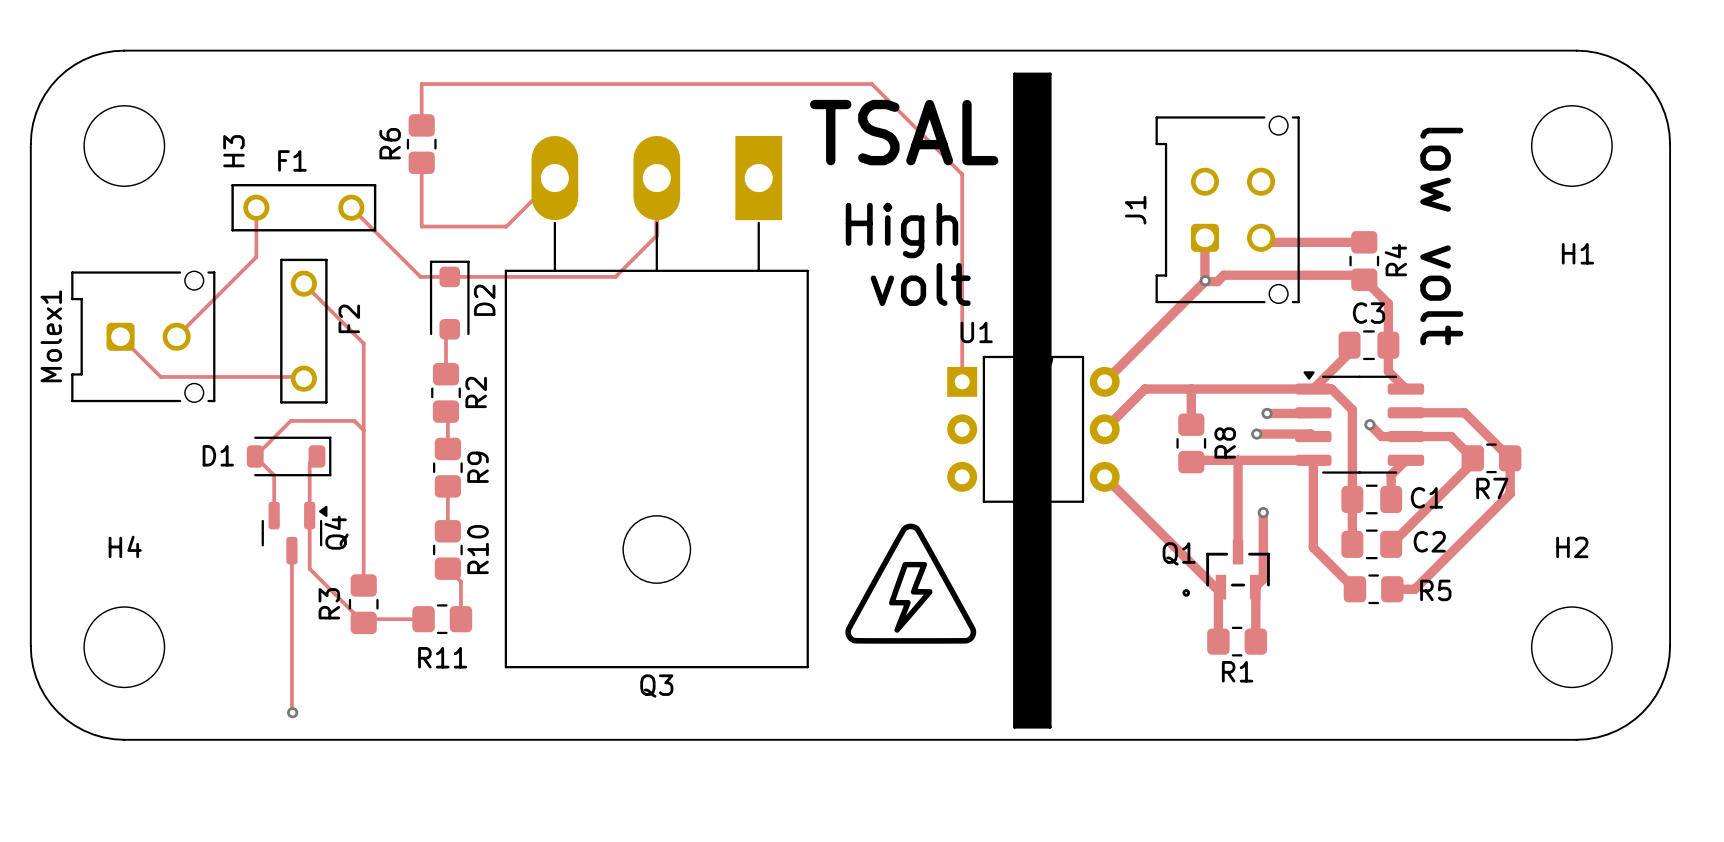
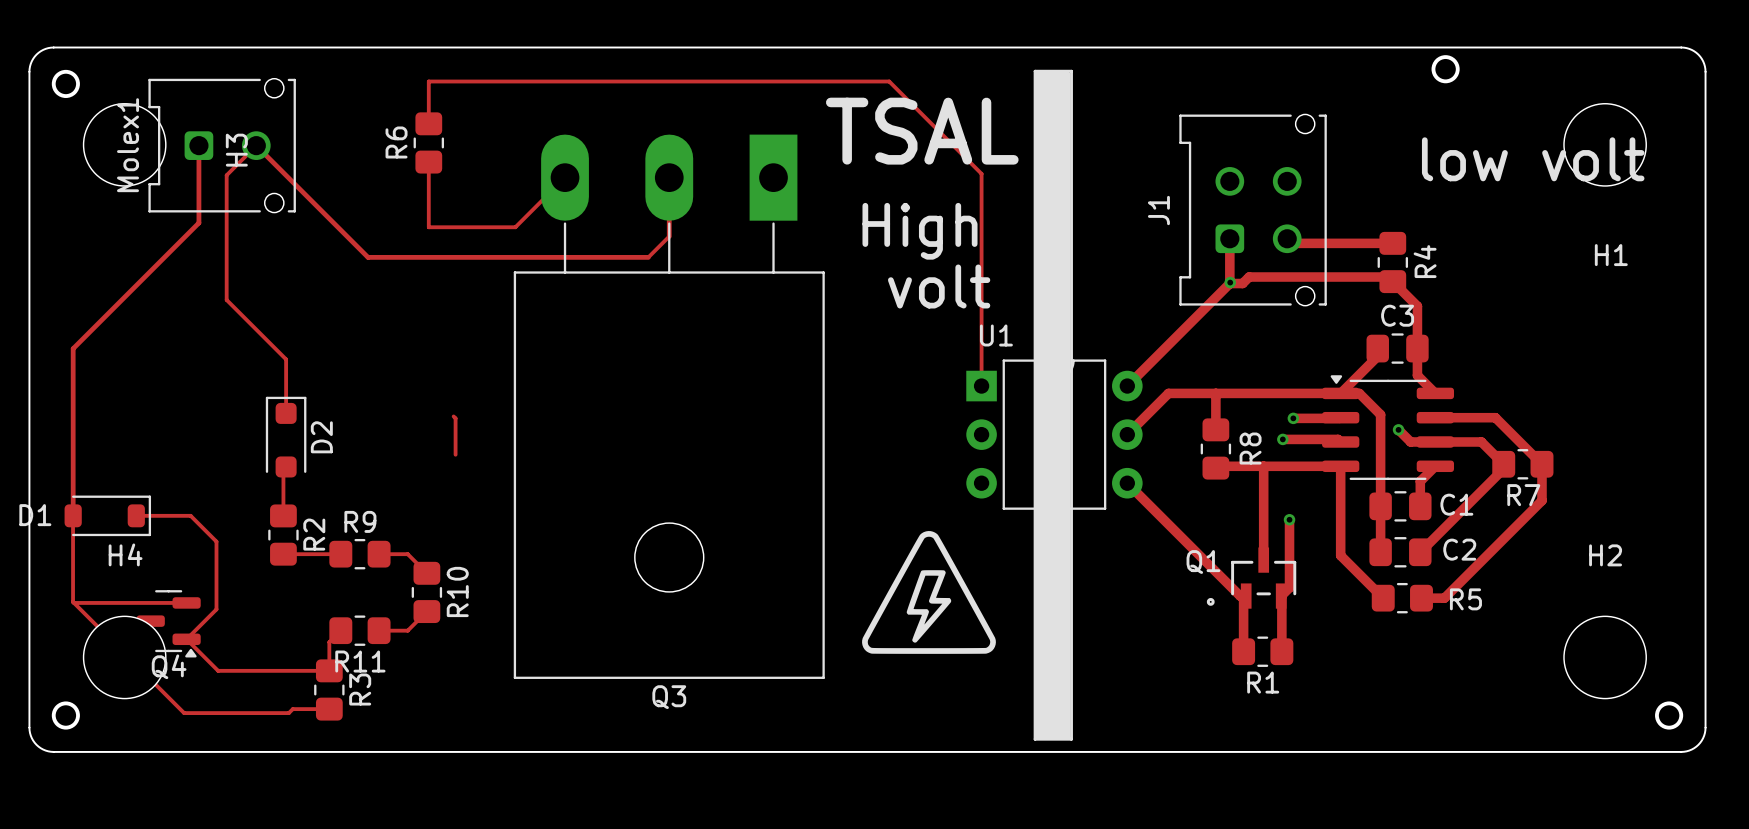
round board edge: none -> [1431, 55, 1460, 84]
round board edge: none -> [51, 69, 80, 98]
board edge: (1670, 144) (1667, 123) (1660, 103) (1642, 78) (1626, 64) (1607, 55) (1576, 50) (113, 51) (83, 59) (58, 78) (40, 103) (33, 123) (30, 144) (31, 656) (36, 677) (51, 704) (66, 719) (93, 734) (124, 739) (1576, 739) (1607, 734) (1626, 725) (1642, 712) (1660, 686) (1667, 667) (1670, 646) -> (1705, 142) (1704, 66) (1696, 52) (1681, 47) (53, 47) (43, 49) (36, 54) (30, 63) (29, 71) (29, 727) (33, 740) (45, 750) (1683, 751) (1696, 746) (1704, 733) (1705, 656)
track: none -> (198, 145) (198, 222) (73, 348) (73, 515)
track: (256, 207) (256, 257) (176, 336) -> none
F1: (303, 207) -> none
track: (351, 207) (420, 276) (615, 276) (636, 256) -> (286, 413) (286, 359) (226, 299) (226, 175) (256, 145) (368, 257) (648, 257)
text rotation: 0° (1441, 236) -> 90° counterclockwise (1533, 159)
track: (303, 283) (363, 343) (363, 585) -> none
D2 position: (449, 300) -> (286, 437)
track: (449, 329) (446, 333) (446, 374) -> none
F2: (303, 331) -> none
track: (120, 336) (160, 376) (302, 376) (303, 378) -> none
Molex1 position: (143, 336) -> (222, 145)
R2 position: (446, 392) -> (283, 535)
track: (363, 430) (354, 420) (290, 420) (255, 456) -> none
track: (255, 456) (274, 475) (274, 515) -> none
D1 position: (289, 456) -> (107, 515)
track: (316, 456) (309, 463) (309, 568) (363, 622) (367, 619) (423, 619) -> none
track: none -> (290, 471) (286, 466) (283, 469) (283, 515)
R9 rotation: 0° (447, 467) -> 90° clockwise (359, 554)
R9 position: (447, 467) -> (359, 554)
R9 name position: R9 (478, 467) -> R9 (360, 521)
track: (447, 486) (447, 531) -> none
track: none -> (73, 515) (73, 601) (184, 713) (288, 713) (292, 709) (329, 709)
track: none -> (136, 517) (190, 515) (216, 541) (216, 609) (186, 639) (218, 670) (329, 670) (329, 642) (340, 630)
Q4 rotation: 0° (294, 533) -> 90° clockwise (168, 623)
Q4 position: (294, 533) -> (168, 623)
track: none -> (283, 554) (340, 554)
track: none -> (379, 554) (407, 554) (426, 573)
R10 position: (447, 549) -> (426, 592)
track: (291, 550) (292, 712) -> none
track: (447, 568) (460, 581) (460, 619) -> none
track: none -> (74, 602) (186, 602)
track: none -> (426, 611) (407, 630) (379, 630)
R3 name position: R3 (329, 603) -> R3 (360, 689)
R3 position: (363, 604) -> (329, 689)
R11 position: (442, 619) -> (359, 630)
R11 name position: R11 (442, 657) -> R11 (360, 661)
round board edge: none -> [51, 701, 80, 730]
round board edge: none -> [1655, 701, 1684, 730]
via: (292, 712) -> none

